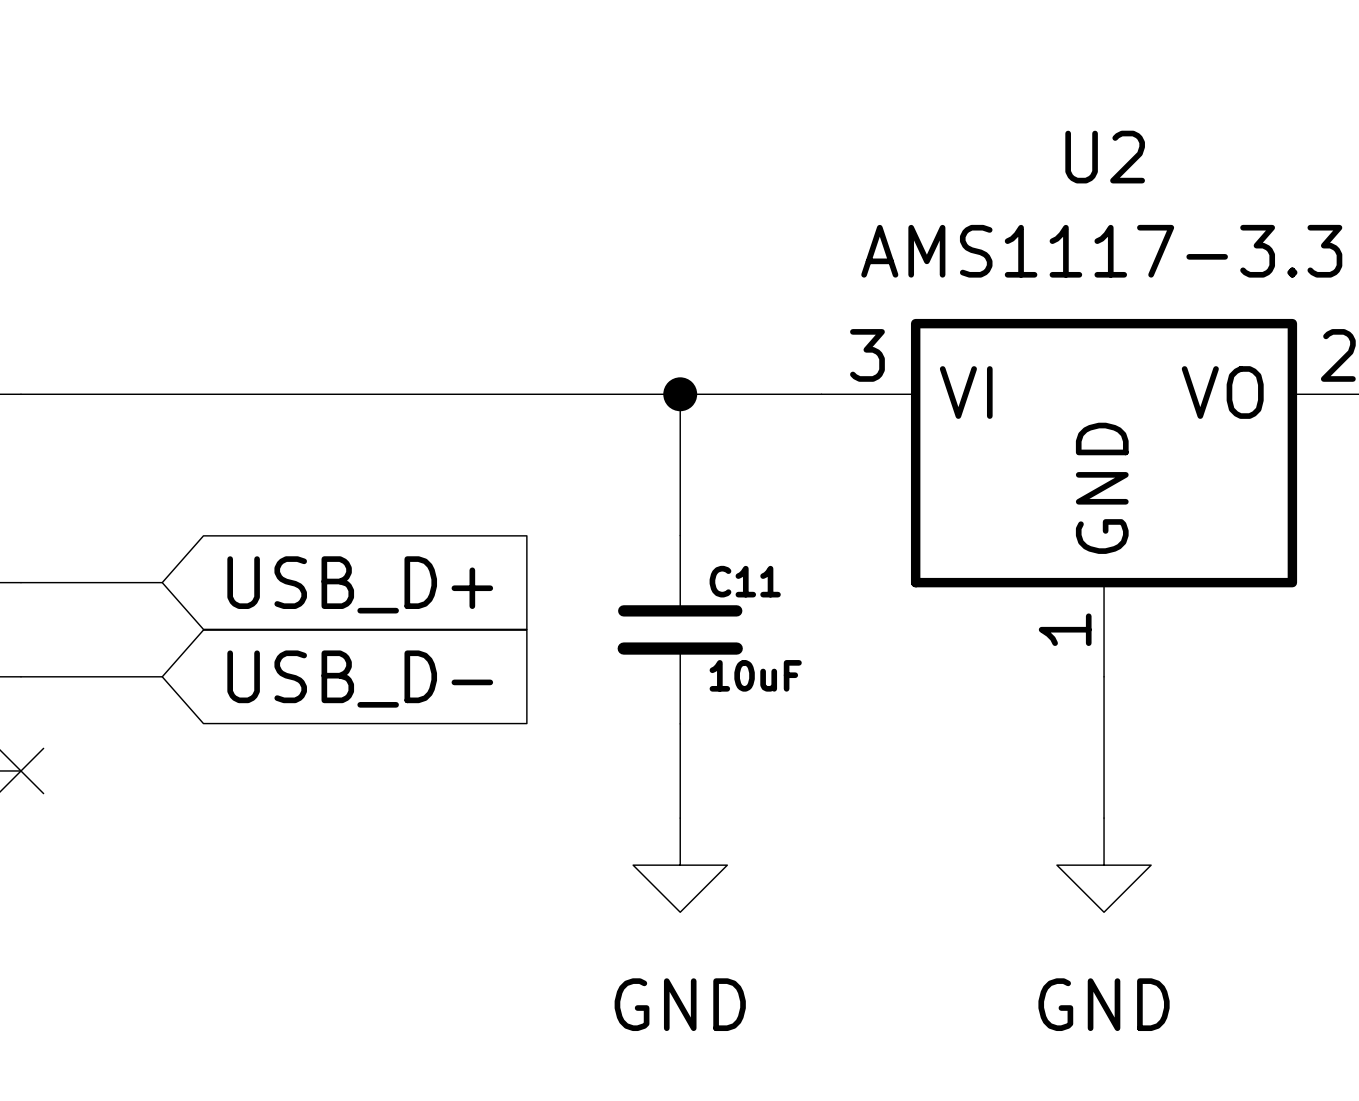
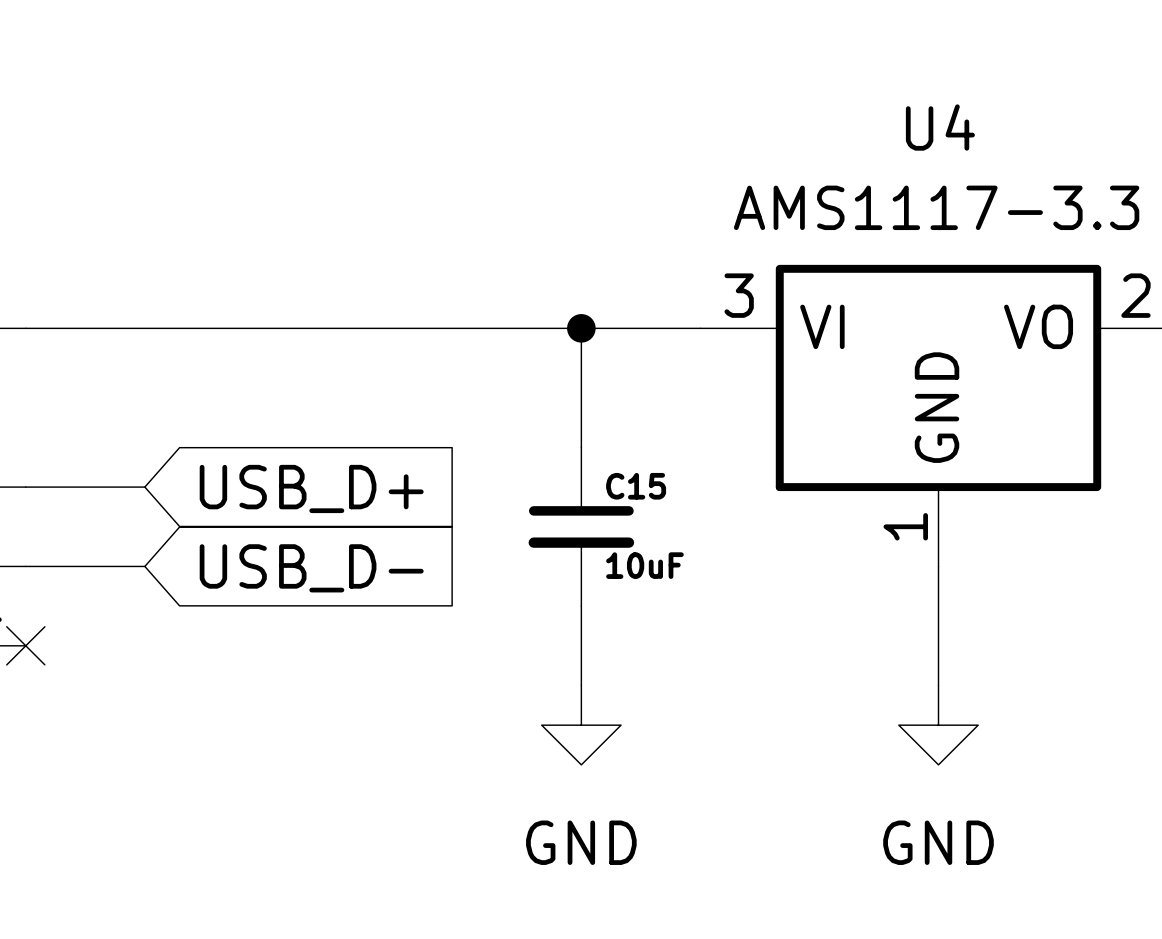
U2 name: U2 (1105, 157) -> U4 (940, 127)
C11 name: C11 (745, 581) -> C15 (636, 486)

